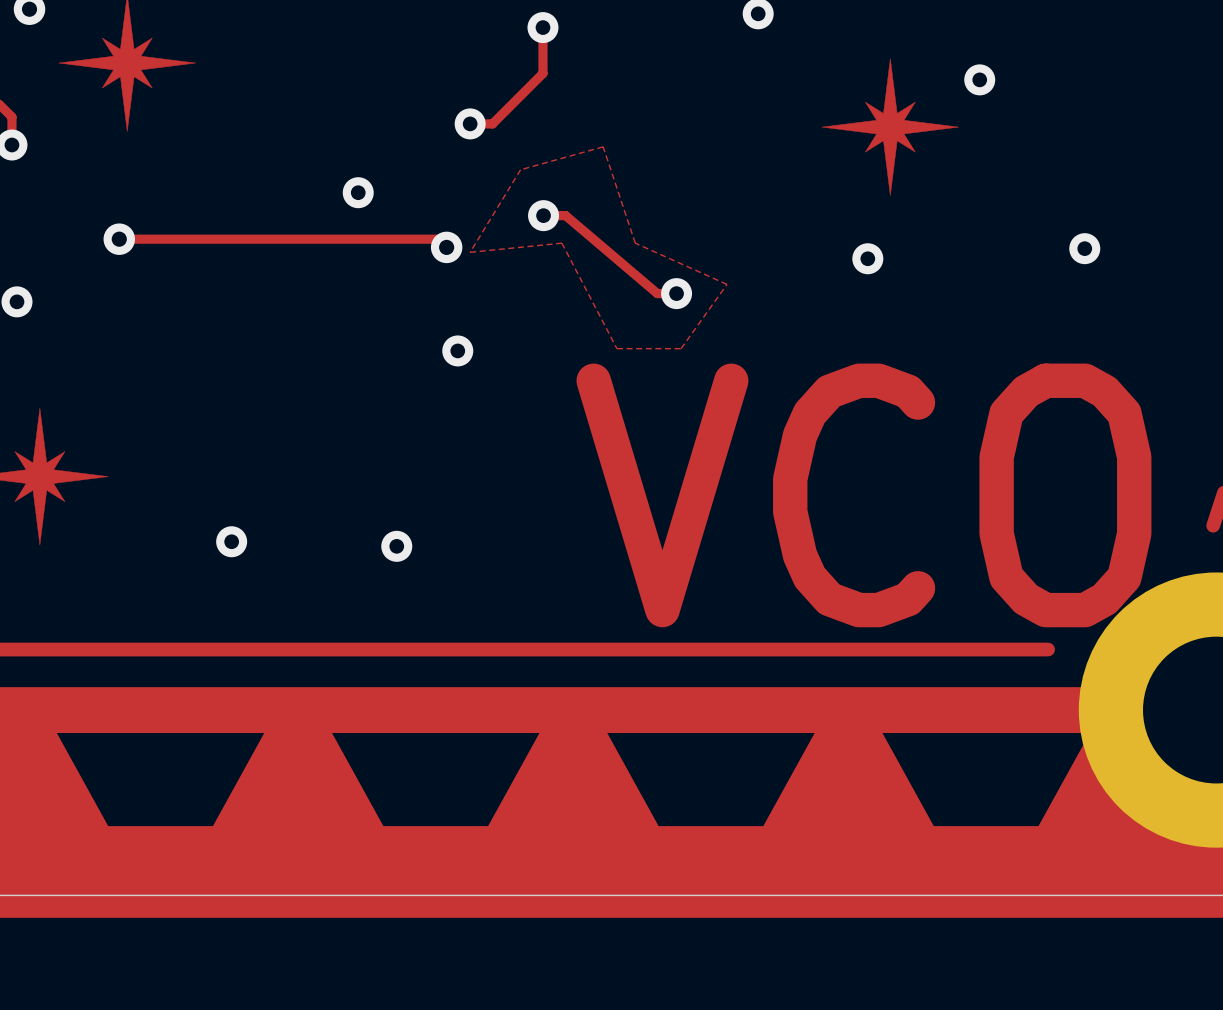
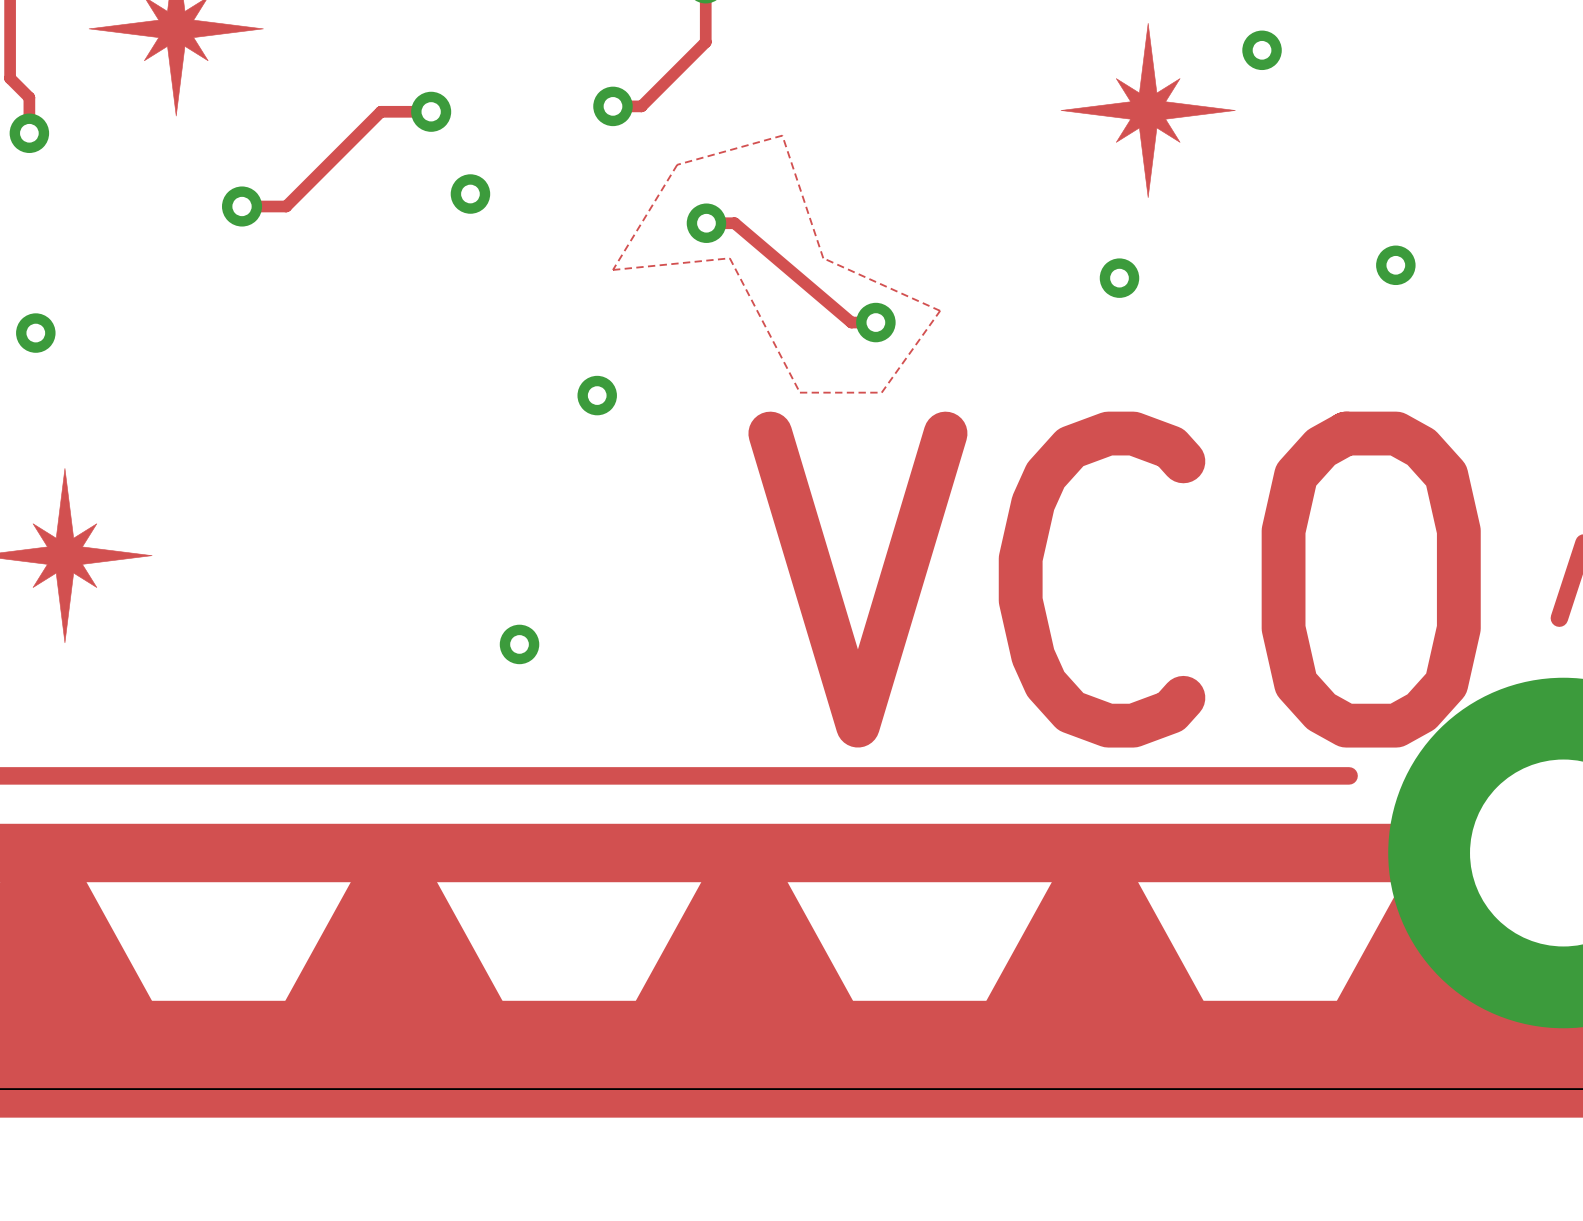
track: none -> (431, 111) (380, 111) (286, 206) (242, 206)
via: none -> (431, 111)
track: (119, 239) (438, 239) (446, 247) -> none
via position: (119, 239) -> (242, 206)
via: (446, 247) -> none
via: (231, 541) -> none

